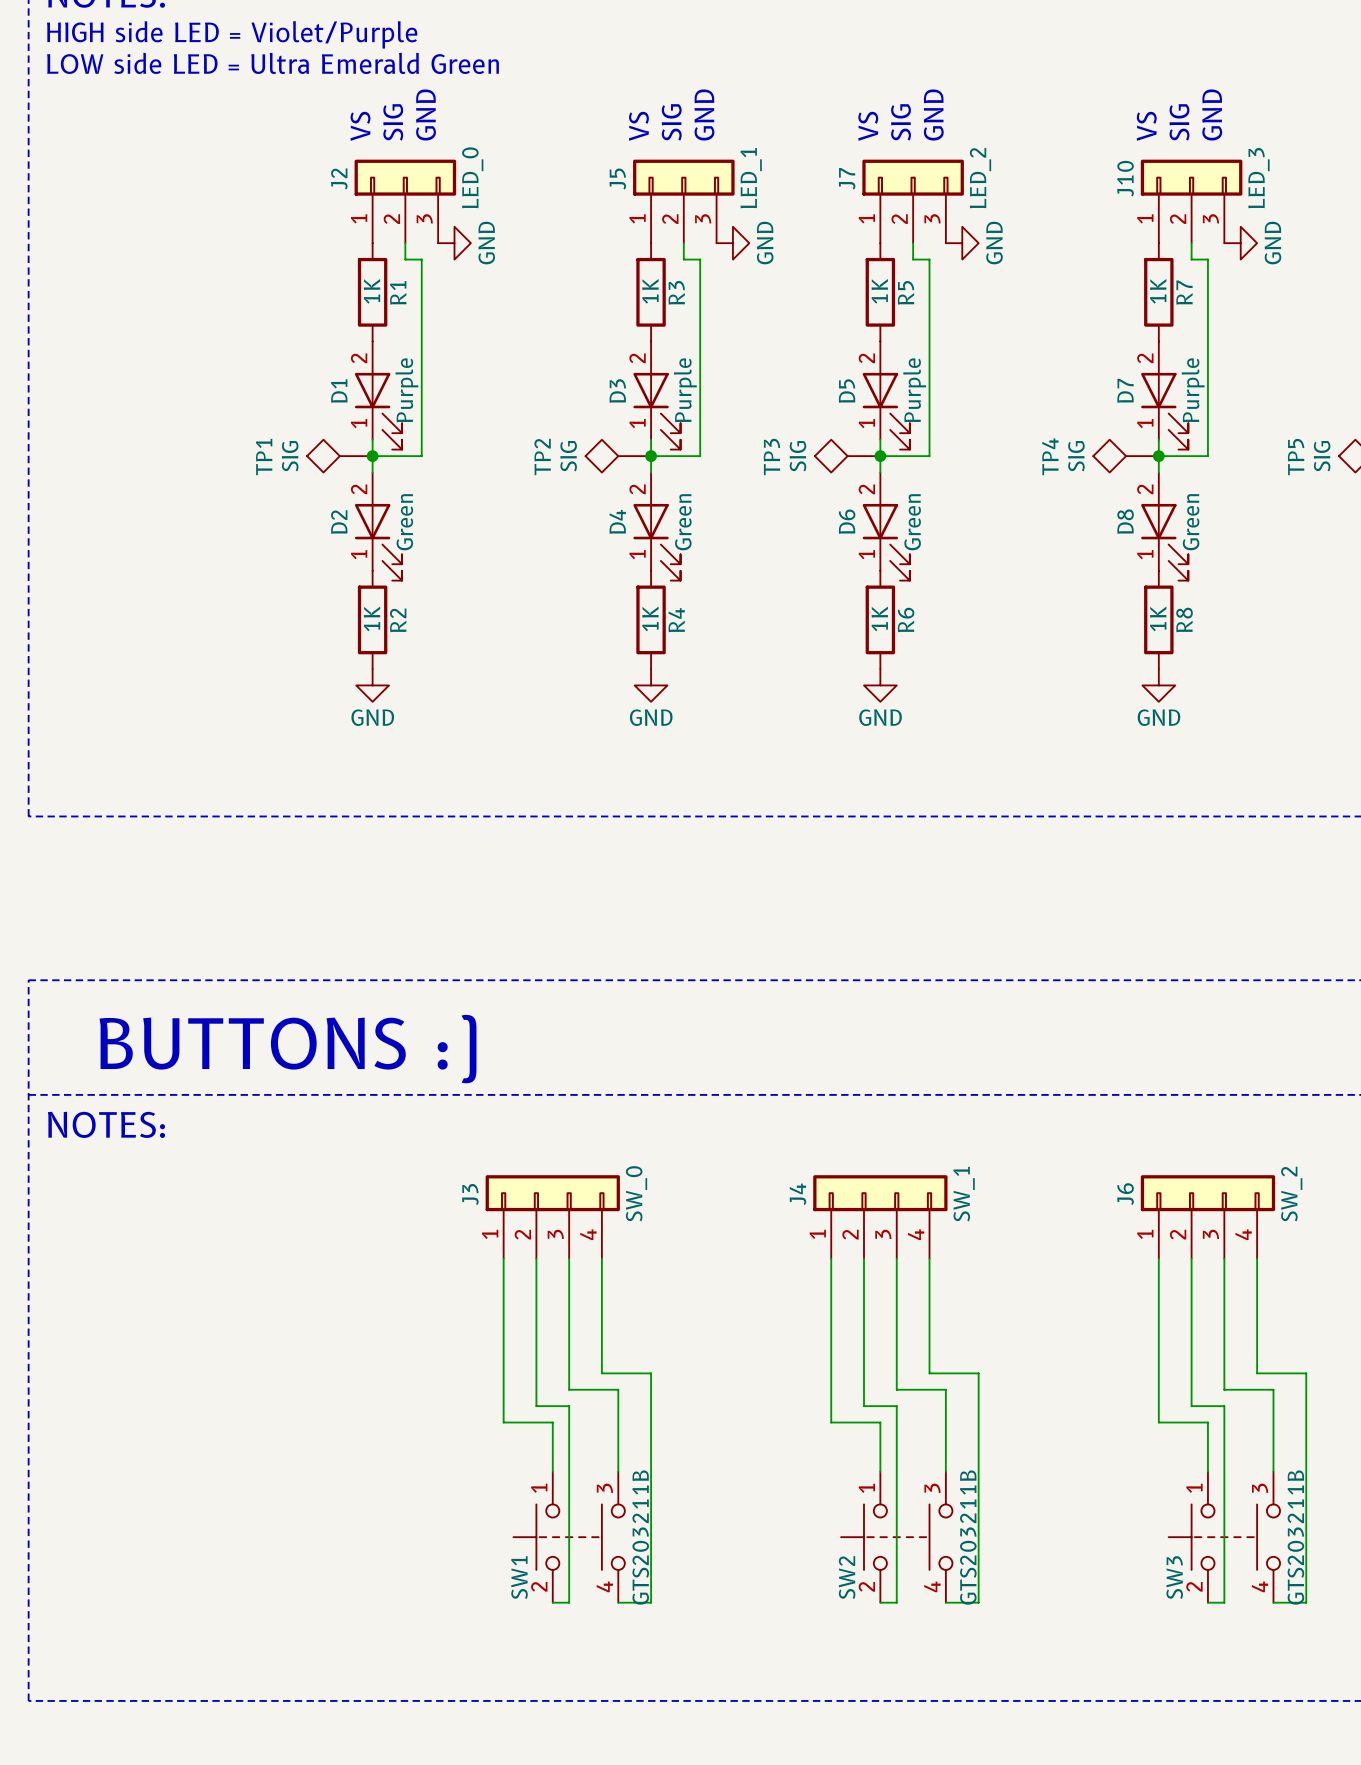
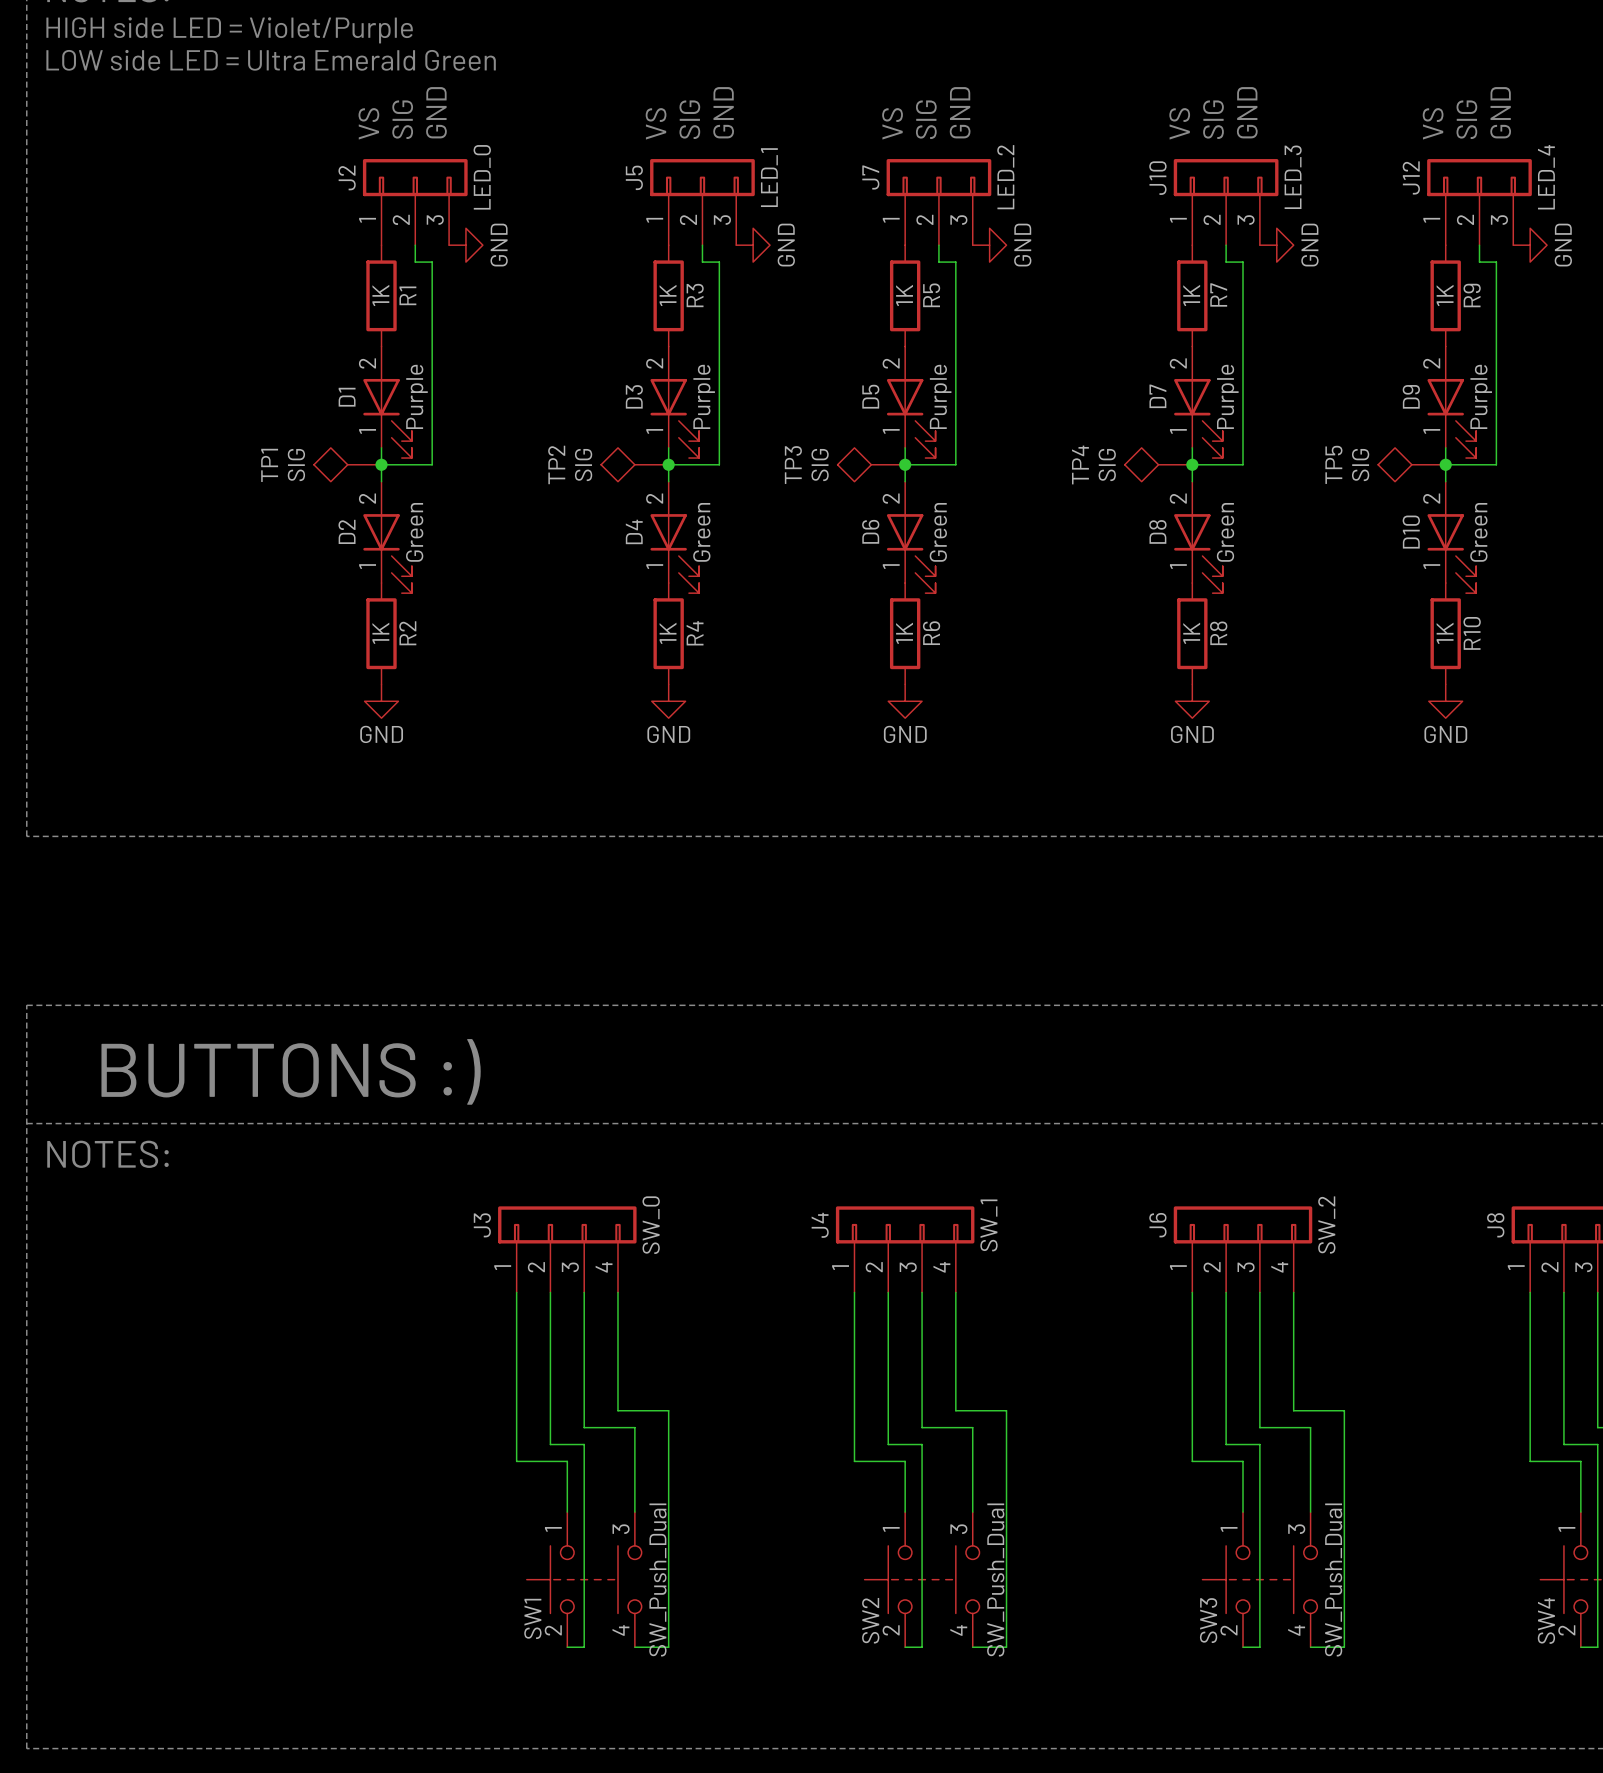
SW1 value: GTS203211B (640, 1537) -> SW_Push_Dual (657, 1579)
SW2 value: GTS203211B (968, 1537) -> SW_Push_Dual (995, 1579)
SW3 value: GTS203211B (1295, 1537) -> SW_Push_Dual (1333, 1579)

